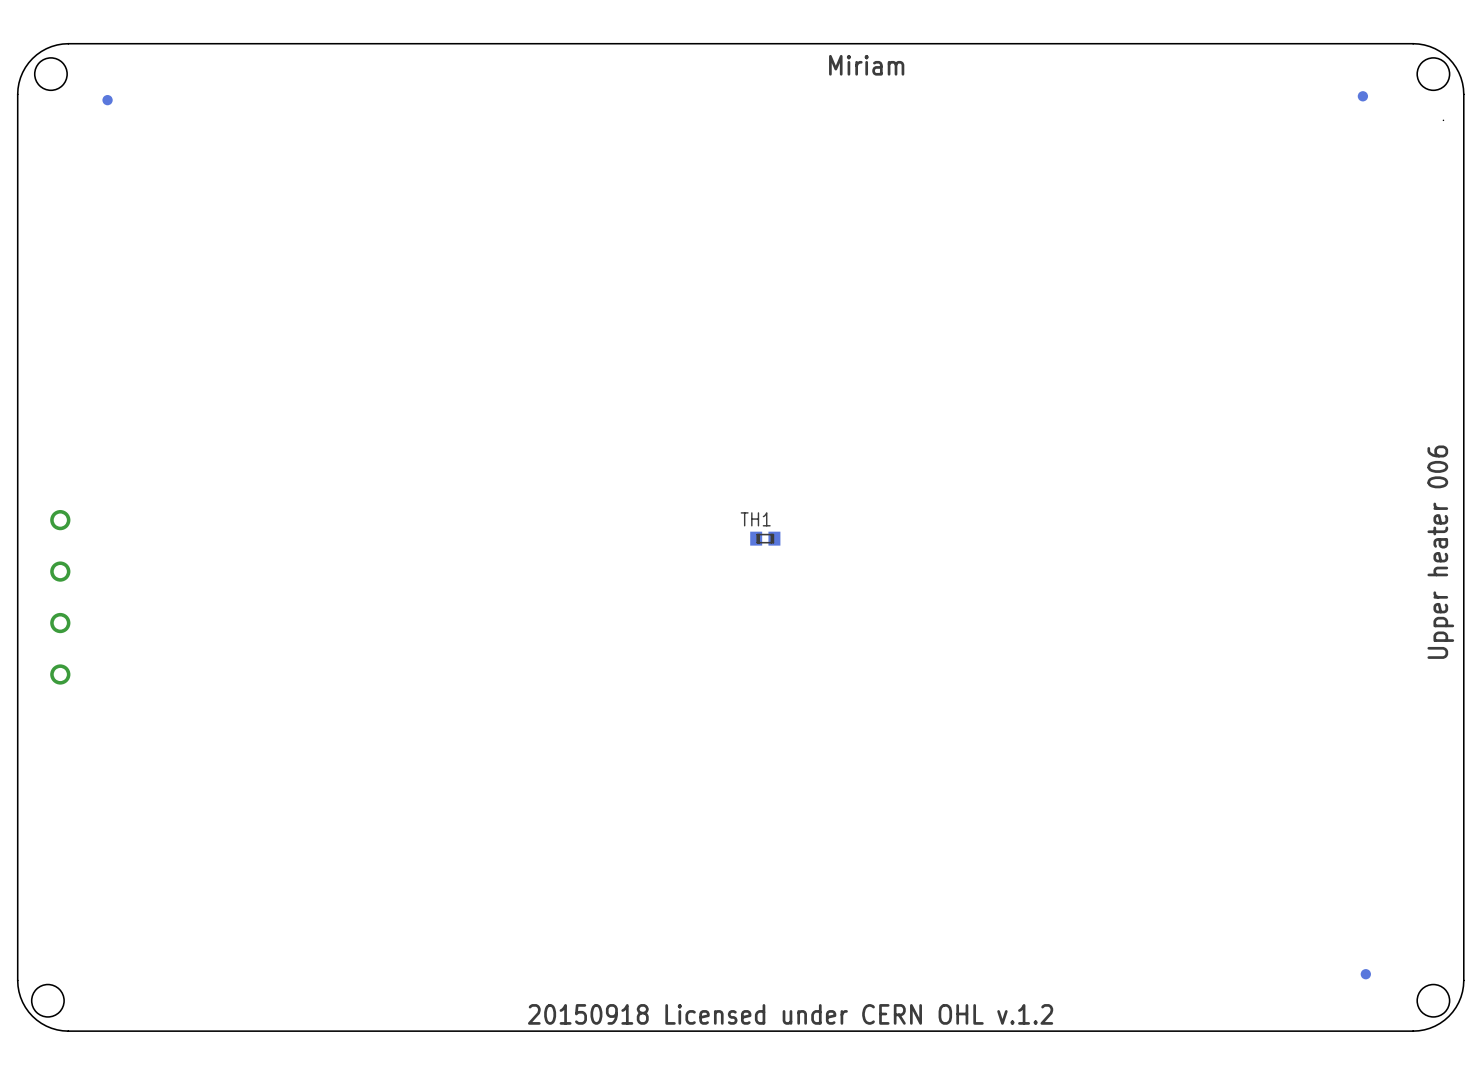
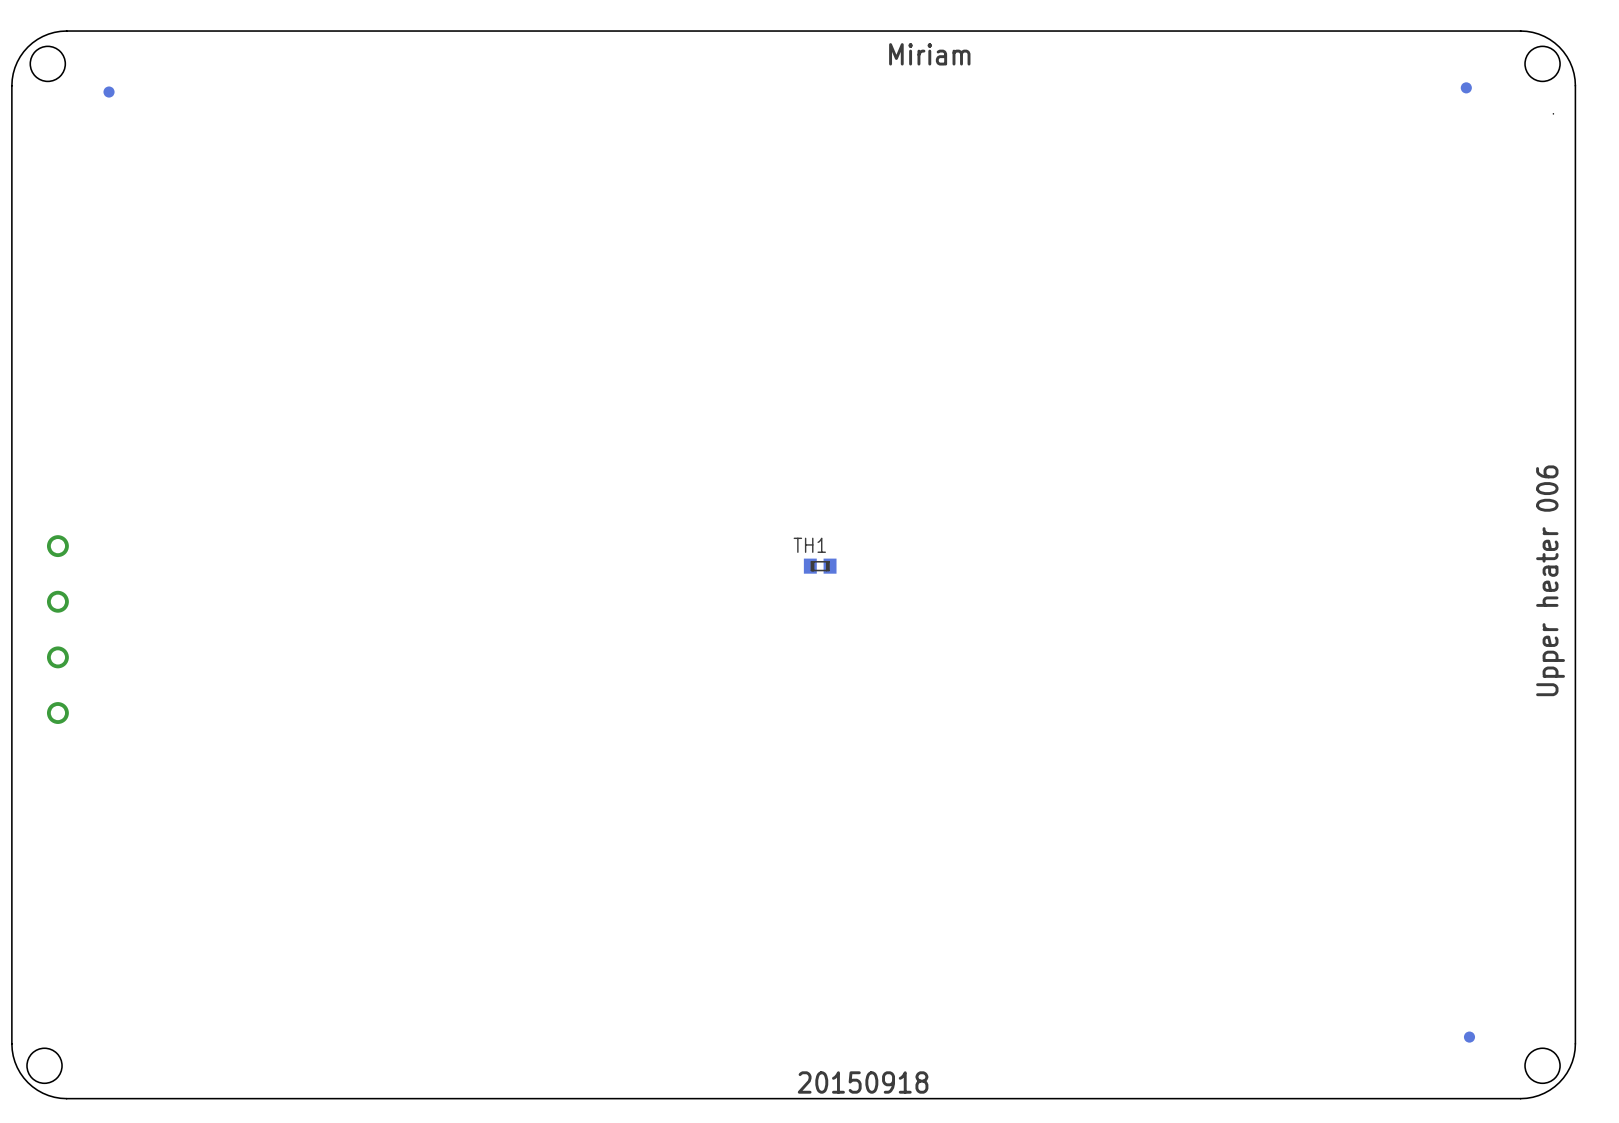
text: 20150918 Licensed under CERN OHL v.1.2 (790, 1014) -> none
text: none -> 20150918 (863, 1082)

